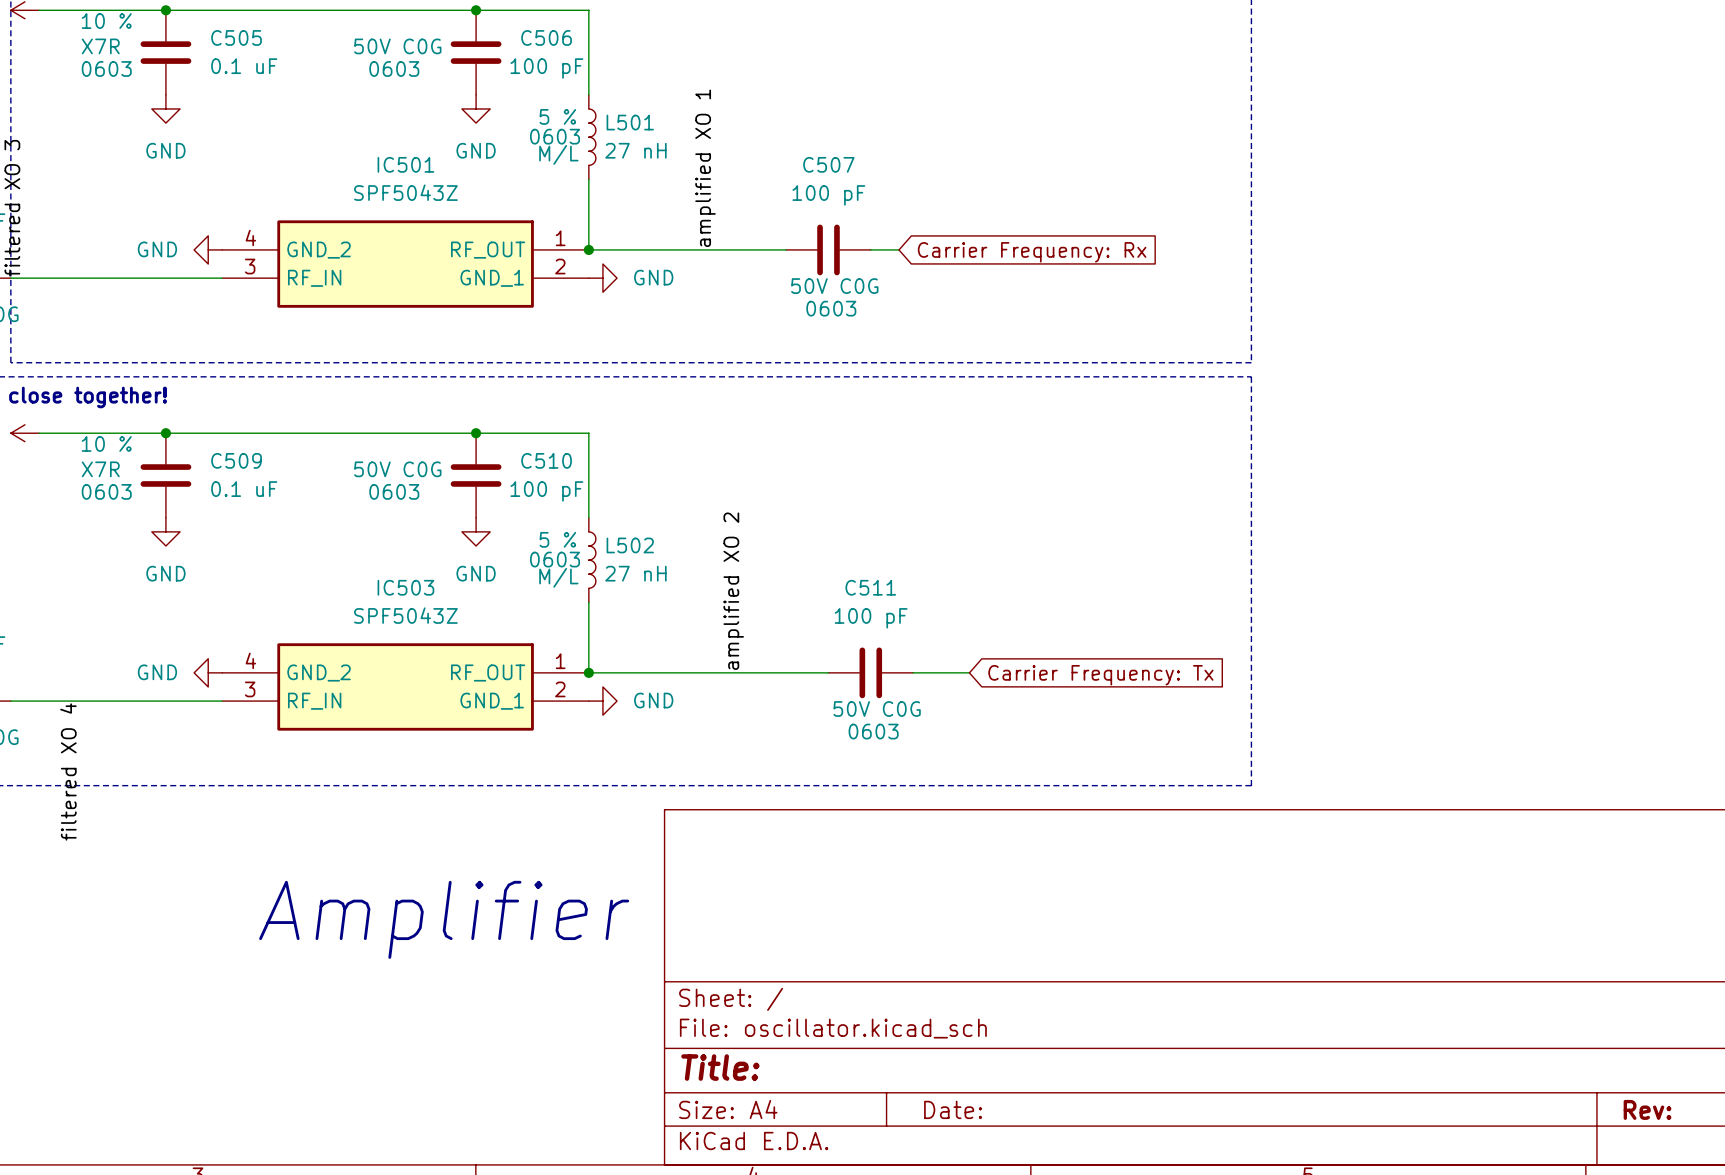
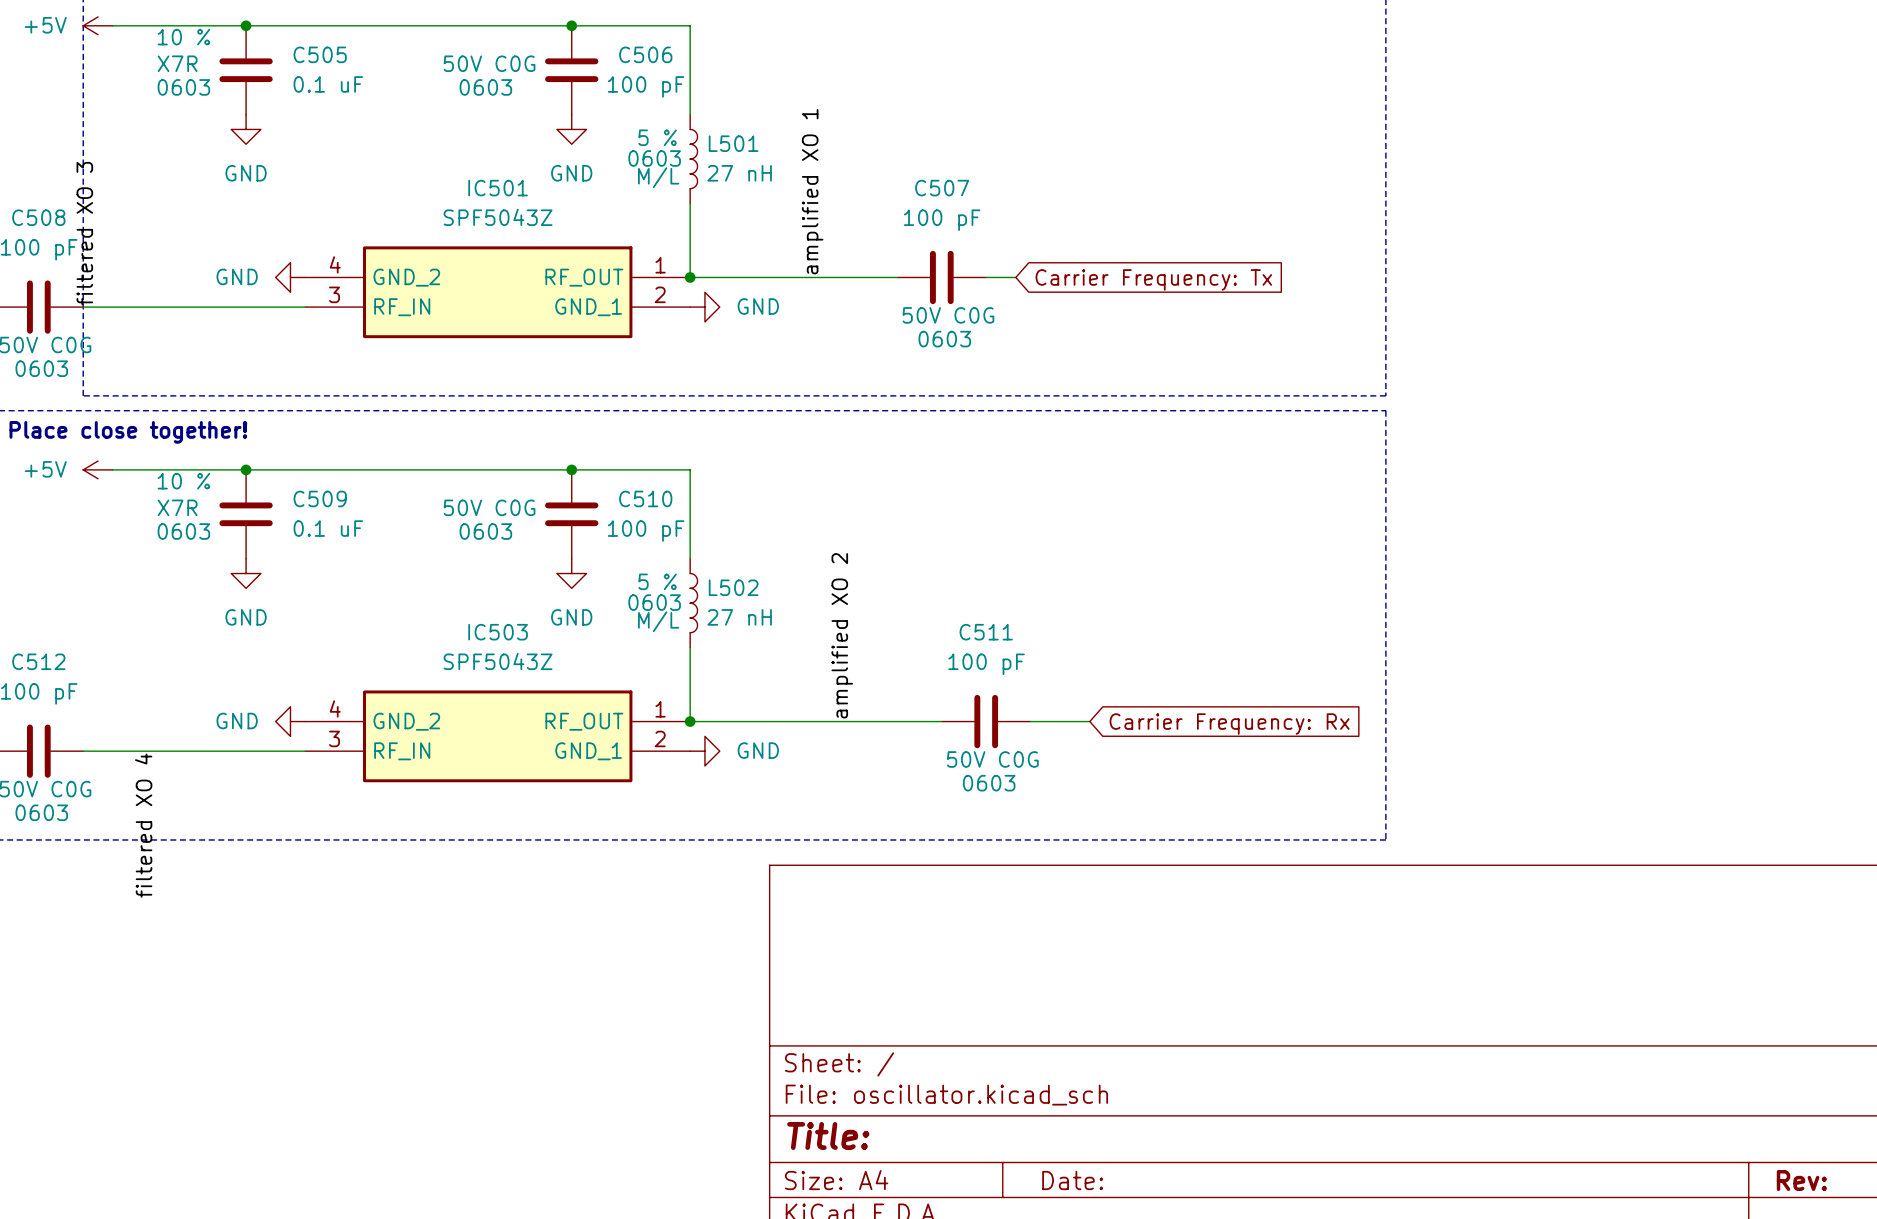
global label: Carrier Frequency: Rx (1032, 252) -> Carrier Frequency: Tx (1153, 279)
global label: Carrier Frequency: Tx (1100, 675) -> Carrier Frequency: Rx (1229, 724)
text: Amplifier (444, 919) -> none

